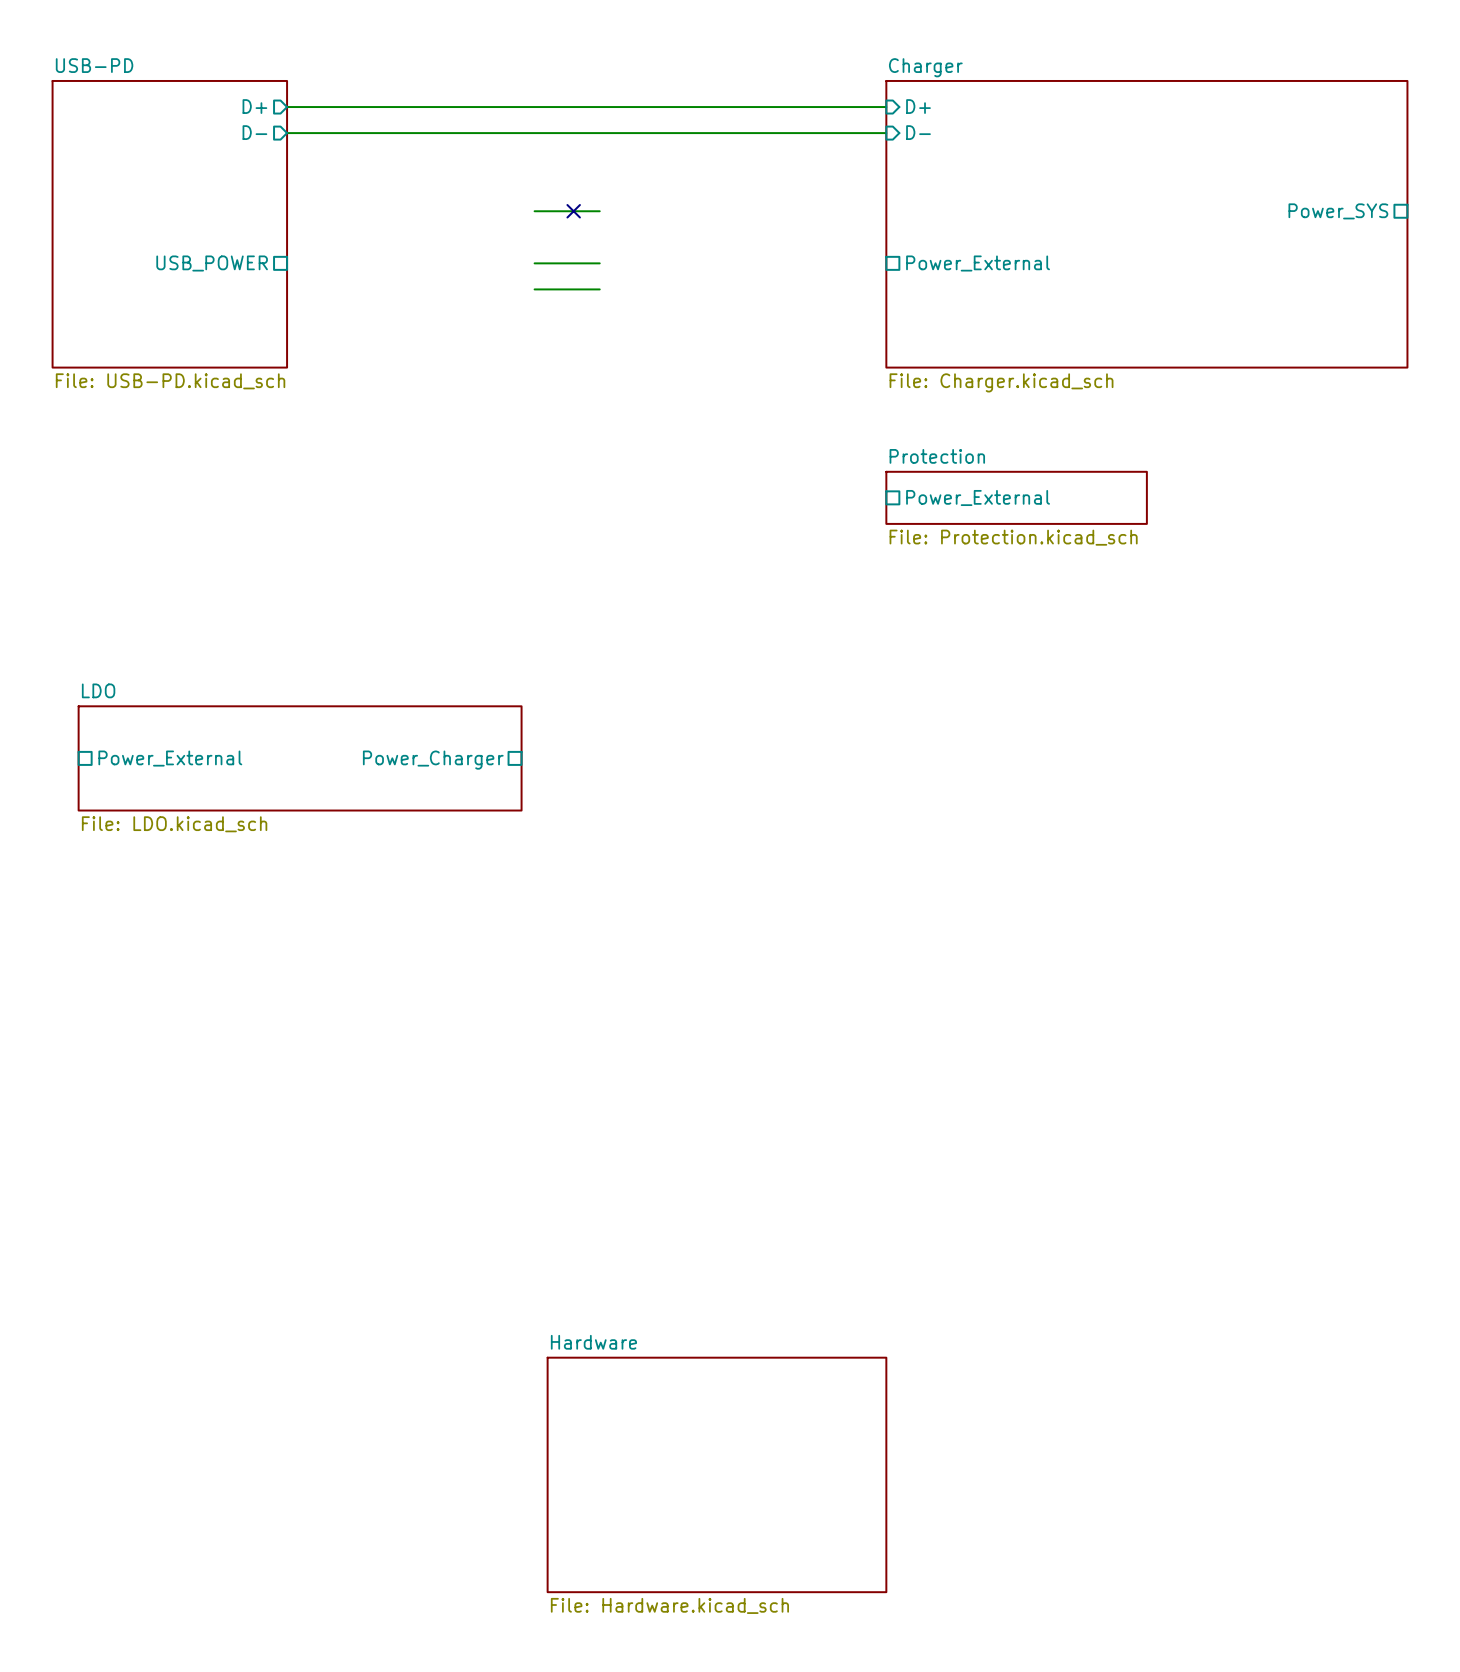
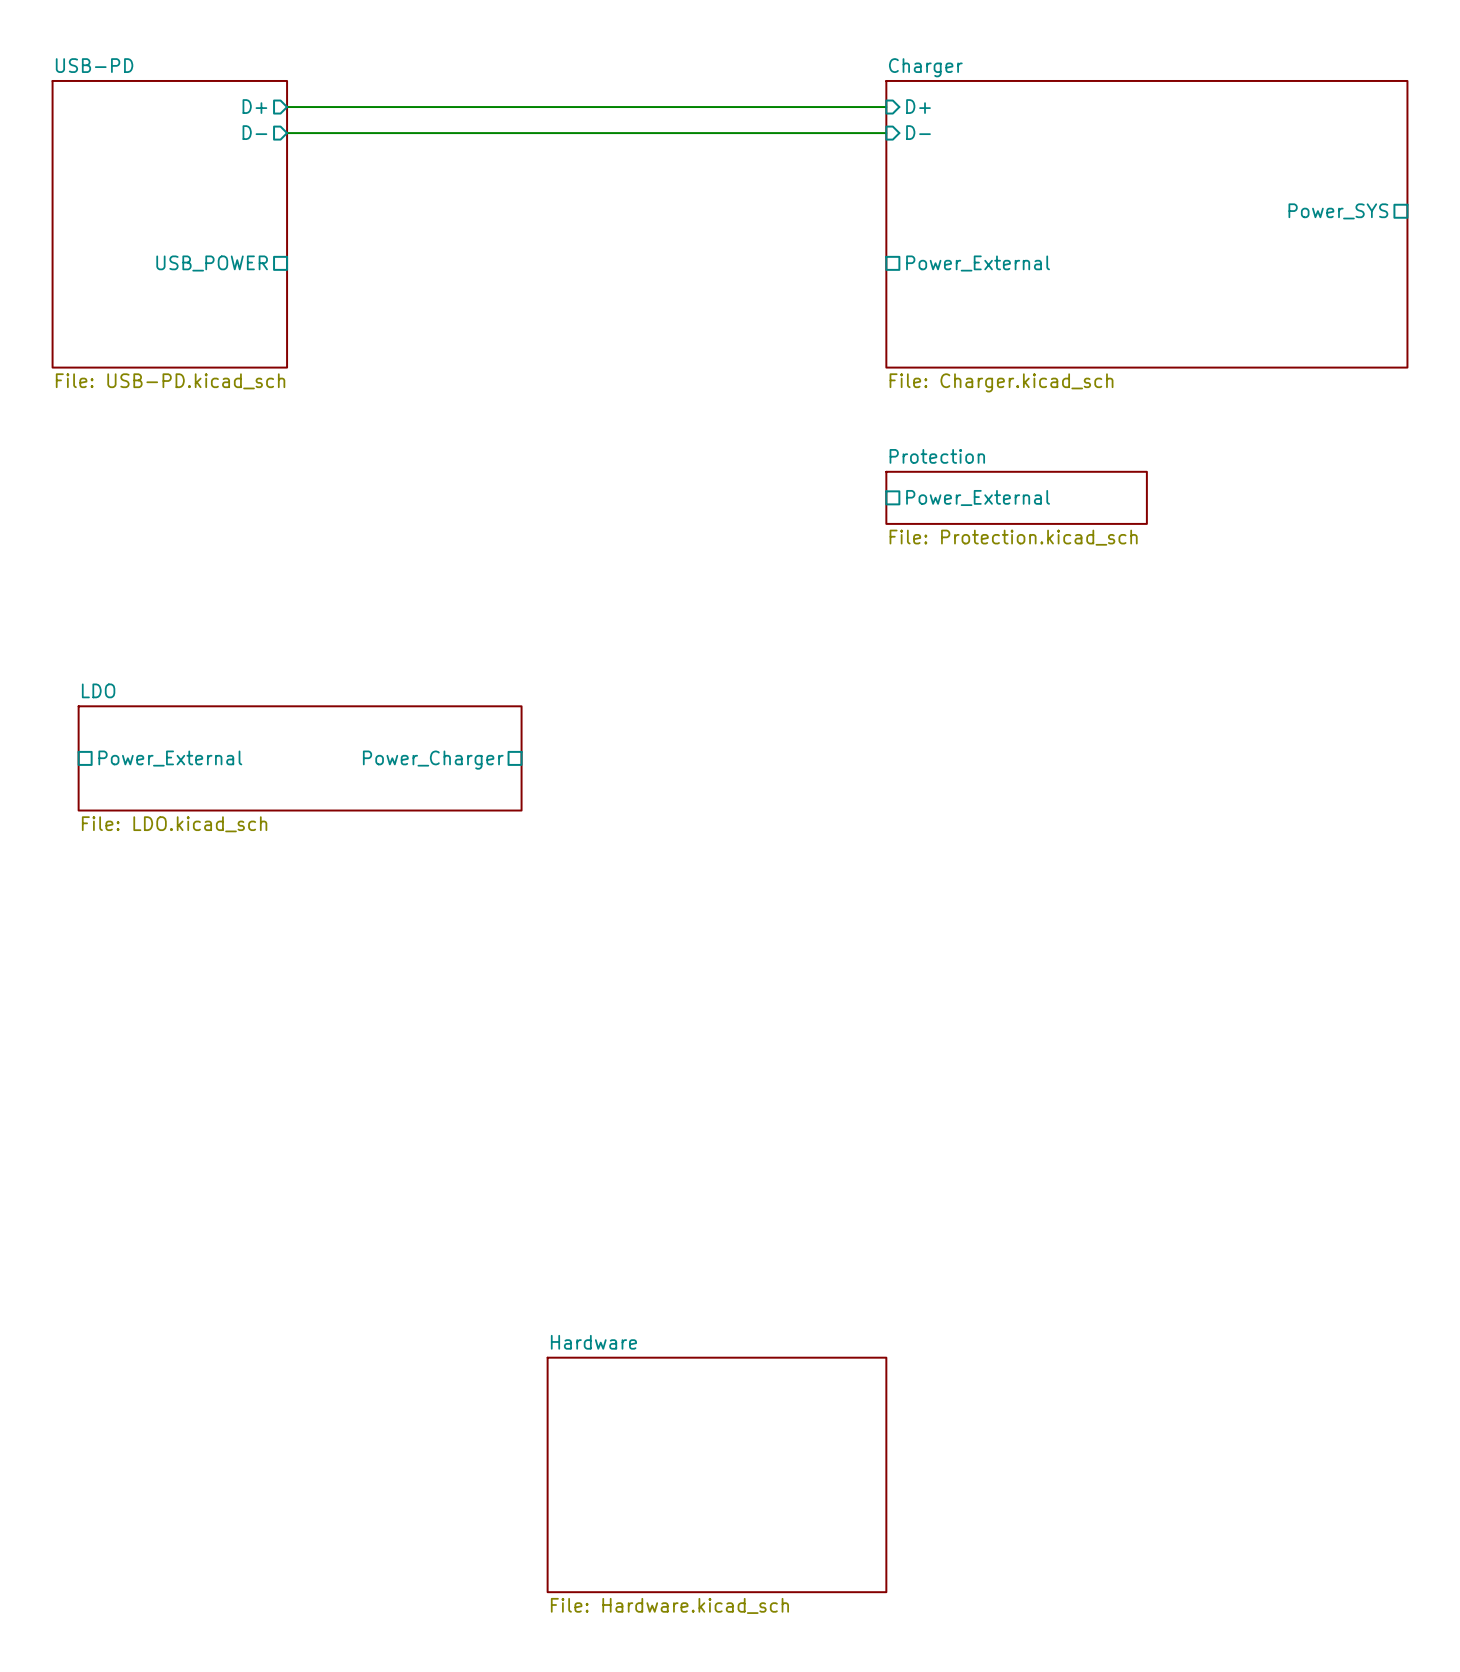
wire: (534, 211) (599, 211) -> none
no-connect mark: (573, 211) -> none
wire: (534, 263) (599, 263) -> none
wire: (534, 289) (599, 289) -> none

